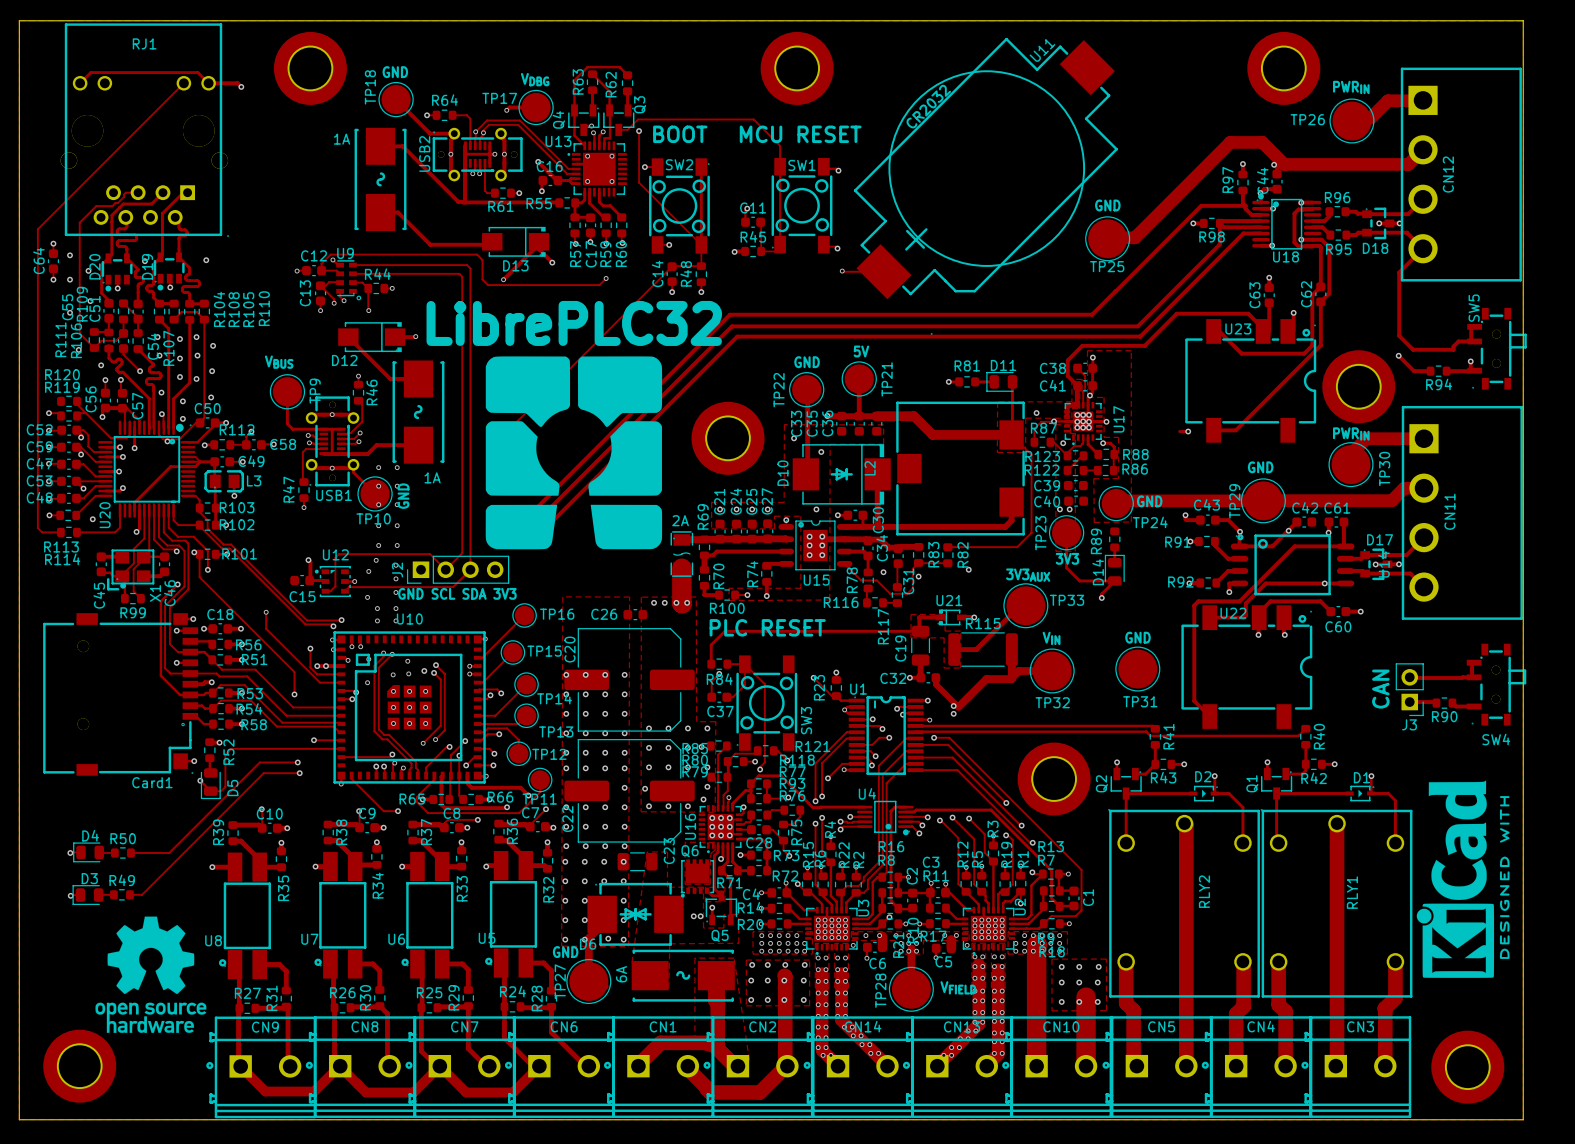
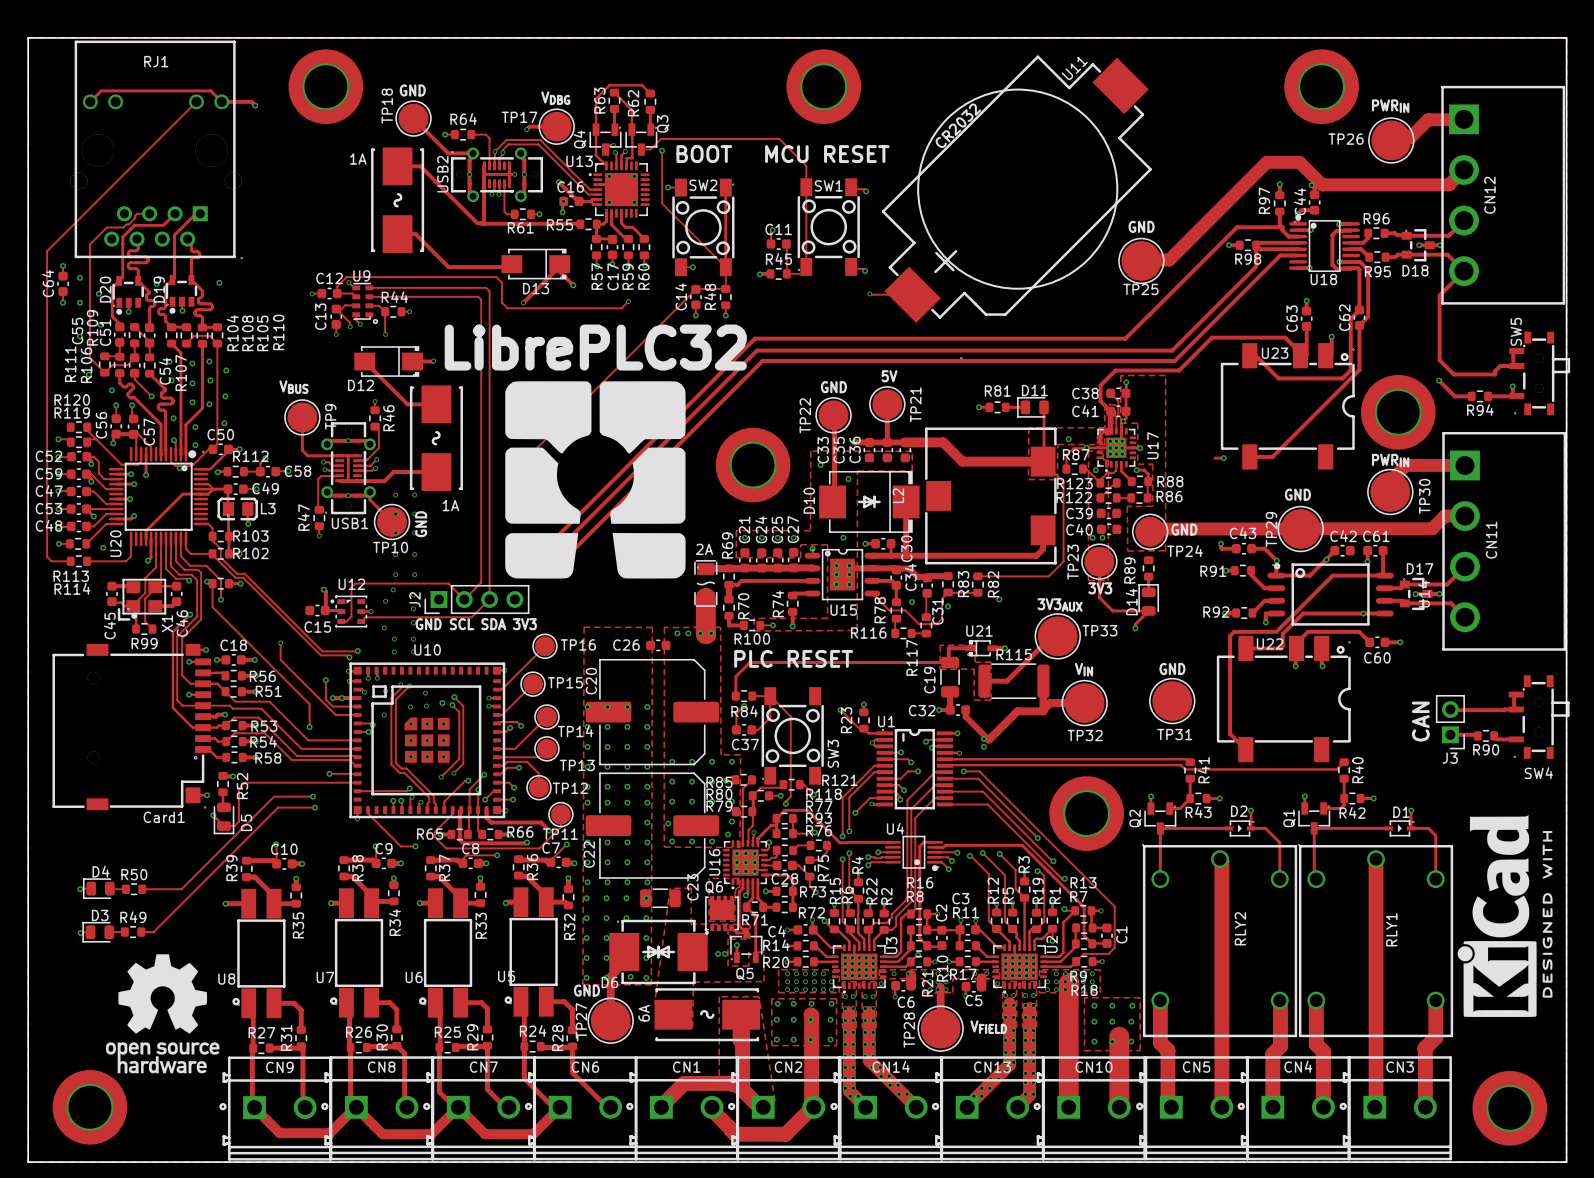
via: none -> (563, 201)
R101 name: R101 (239, 553) -> none

